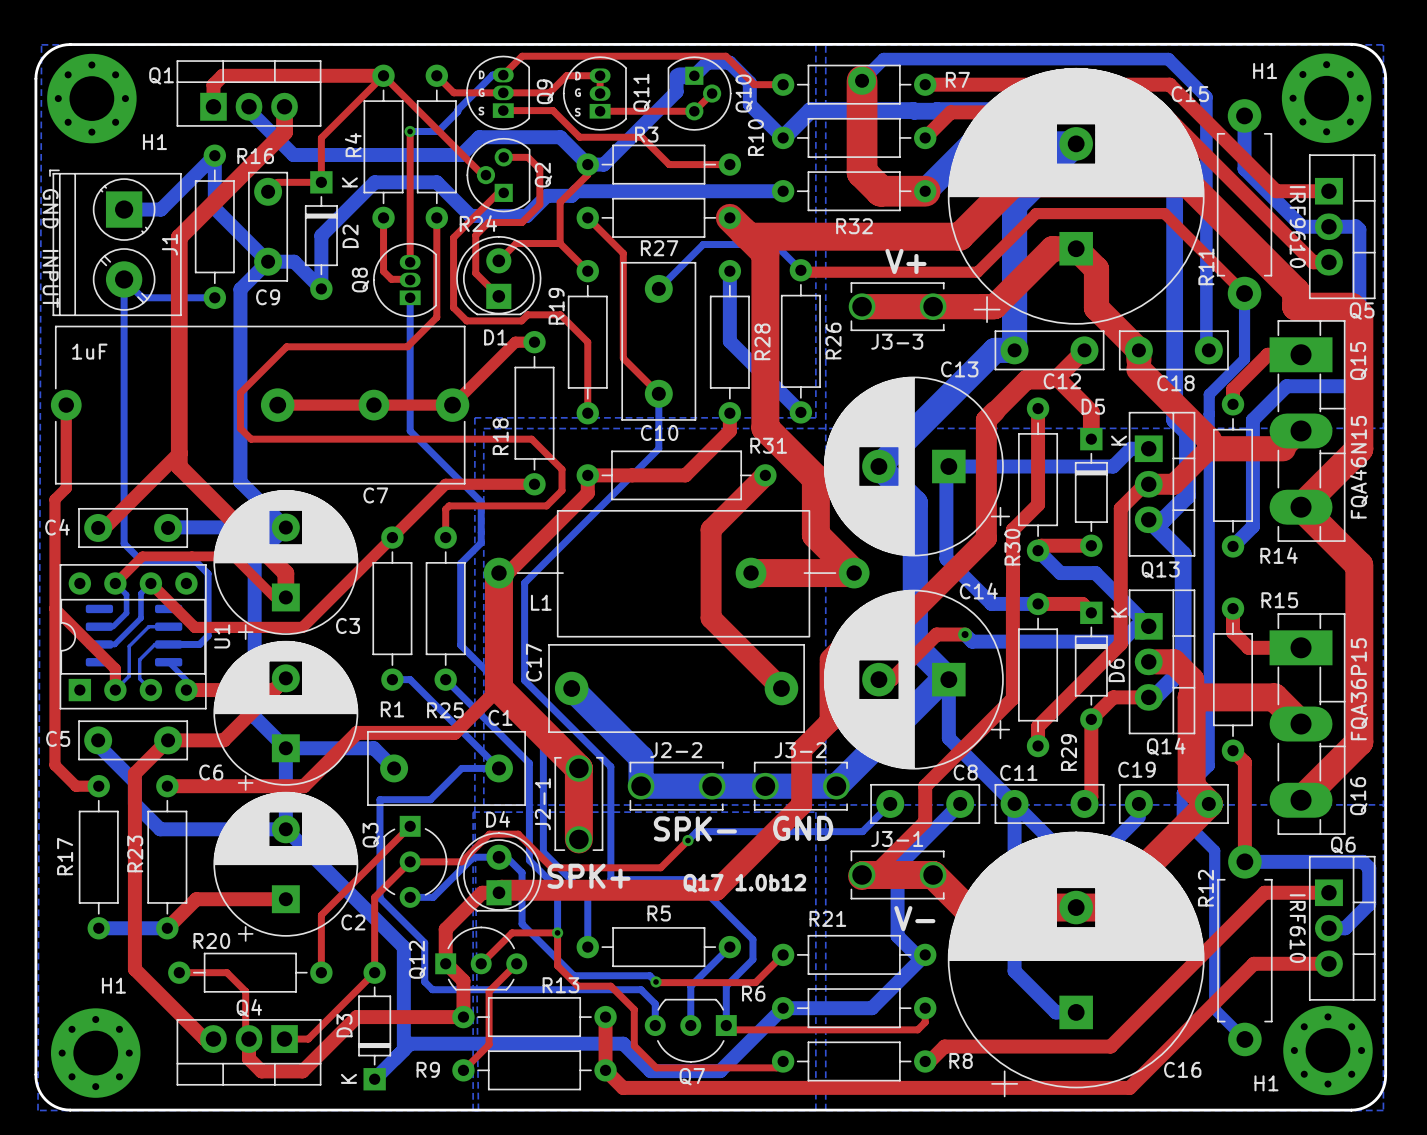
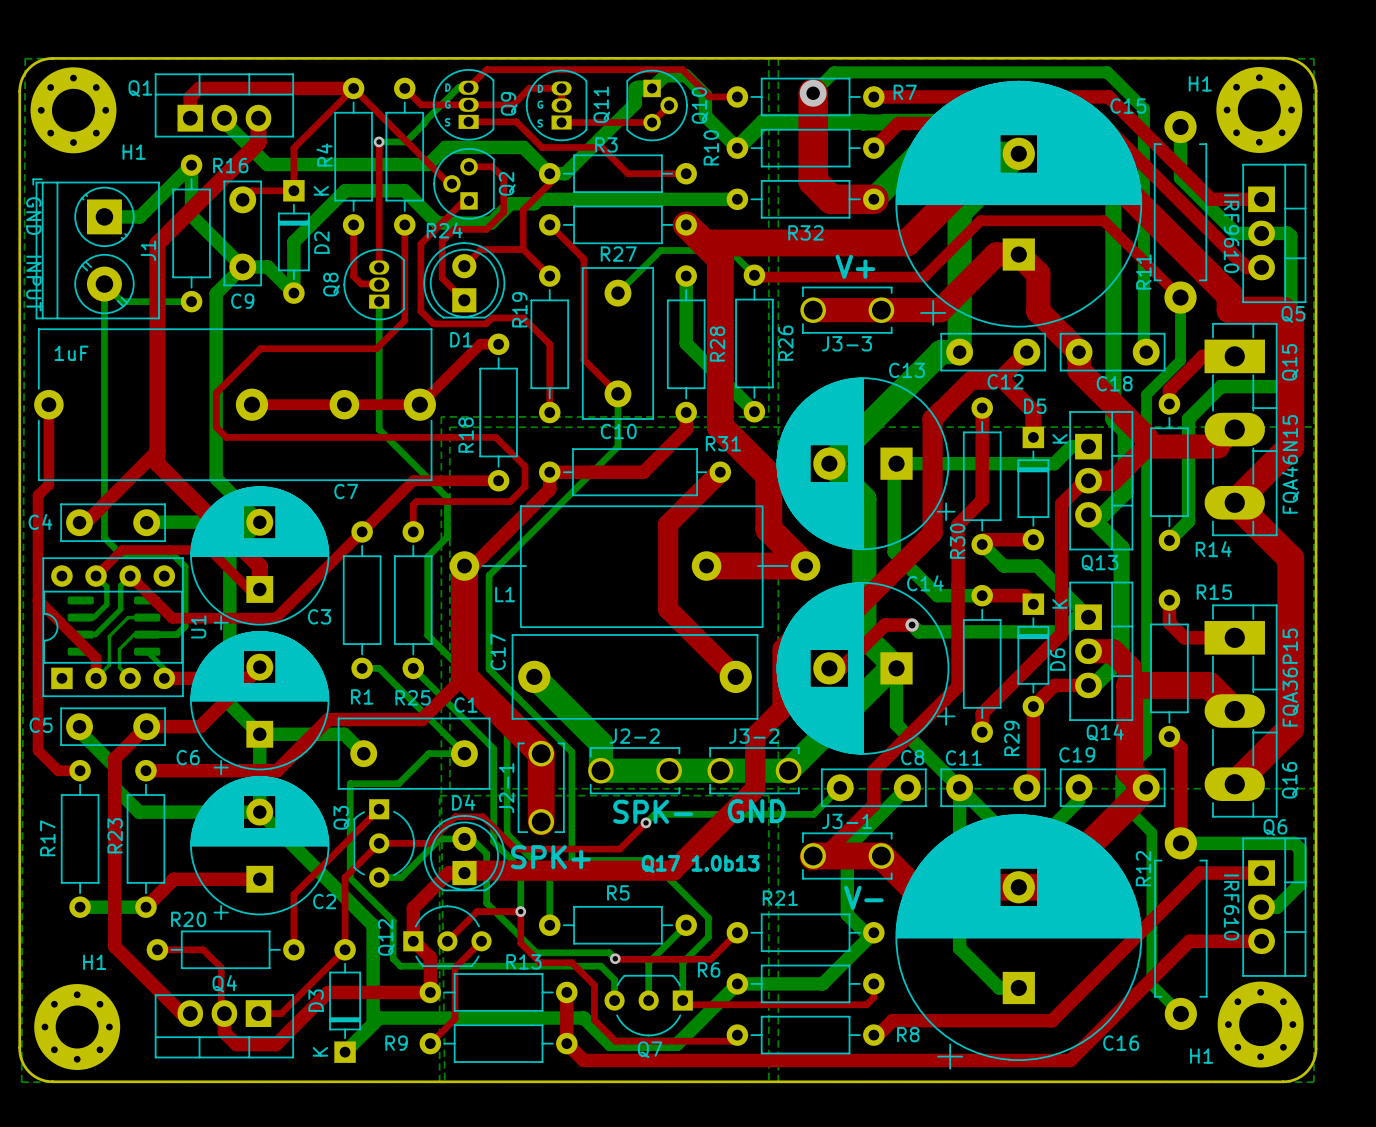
text: Q17 1.0b12 (744, 883) -> Q17 1.0b13 (700, 863)

